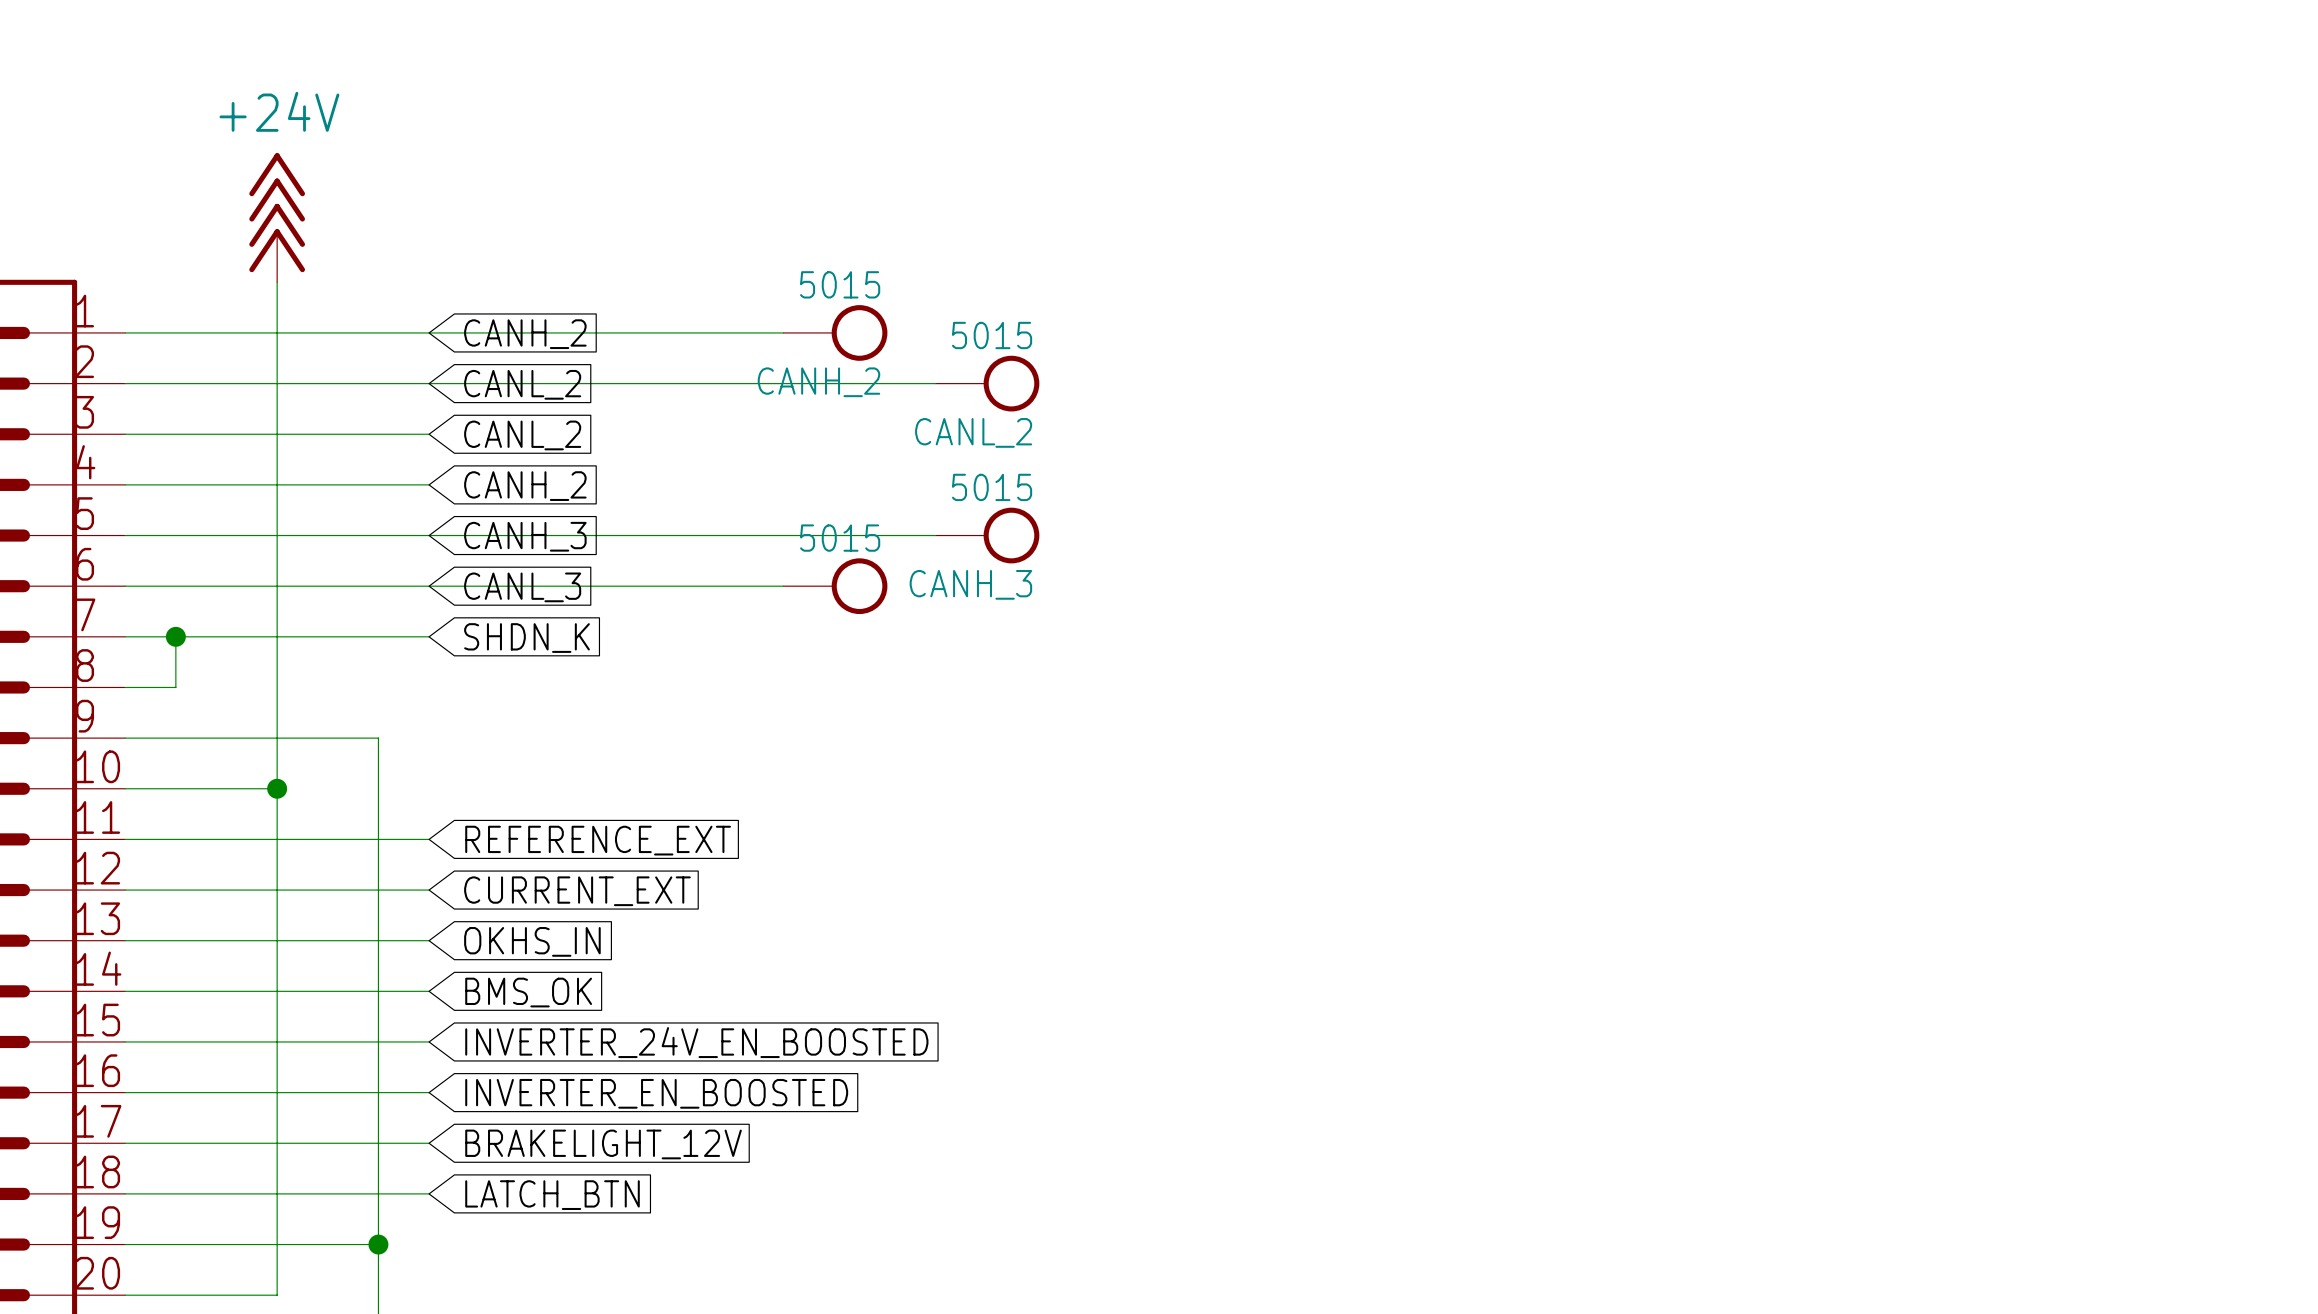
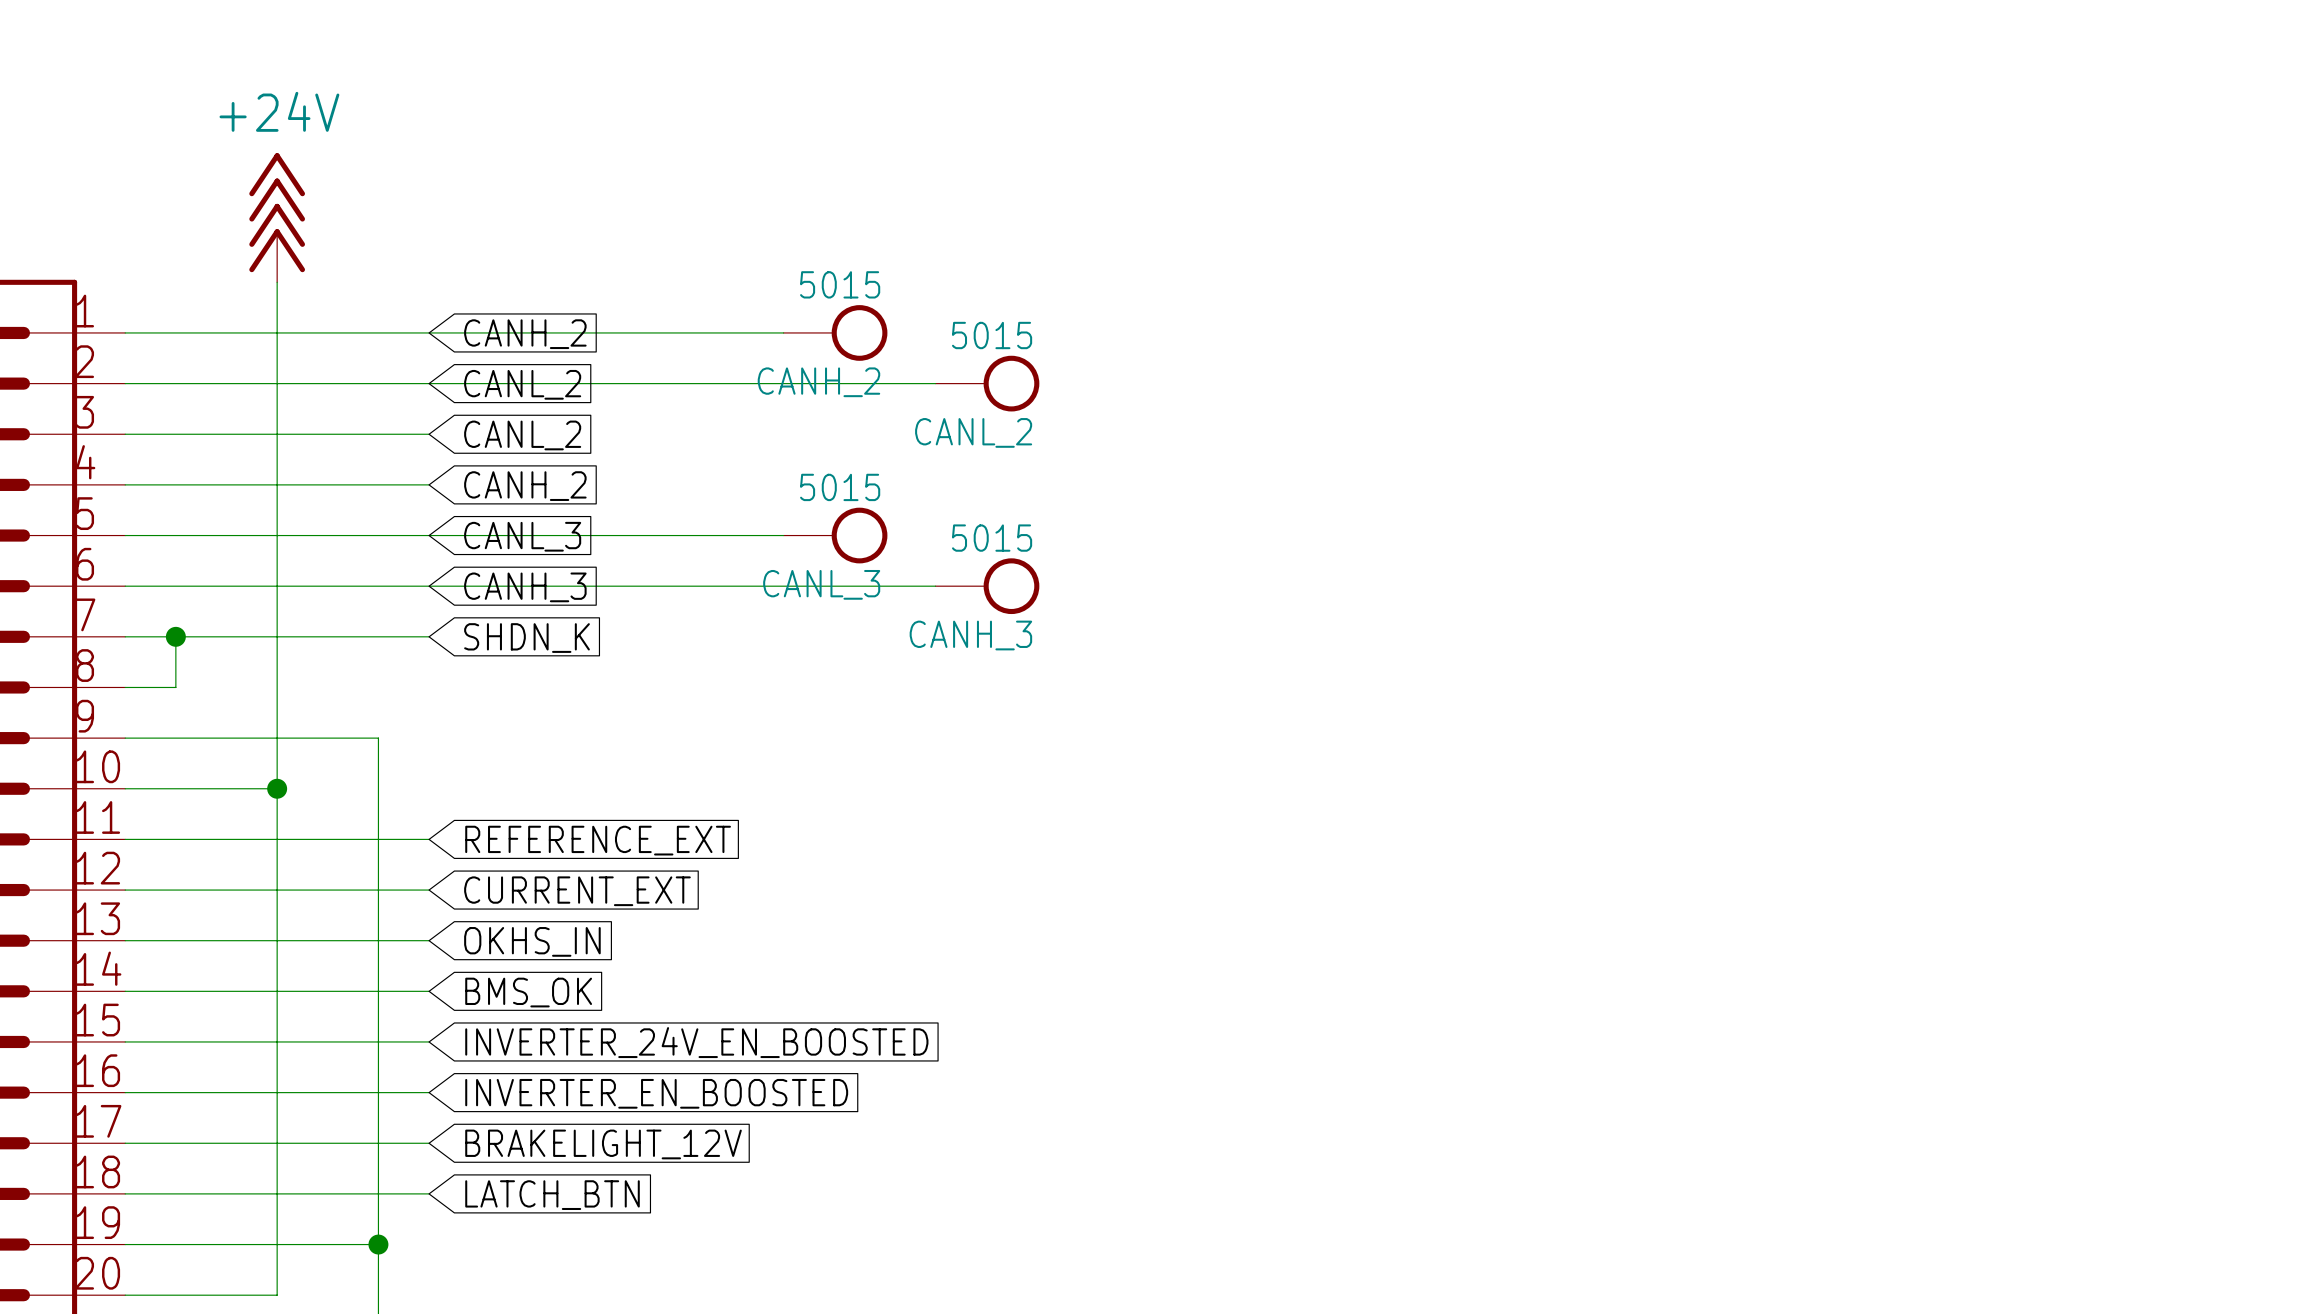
wire: (783, 535) (935, 535) -> (783, 586) (935, 586)
CANL_3: none -> (835, 535)
CANH_3 position: (987, 535) -> (987, 586)
global label: CANH_3 (525, 536) -> CANL_3 (522, 536)
part: (835, 586) -> none
global label: CANL_3 (522, 587) -> CANH_3 (525, 587)

